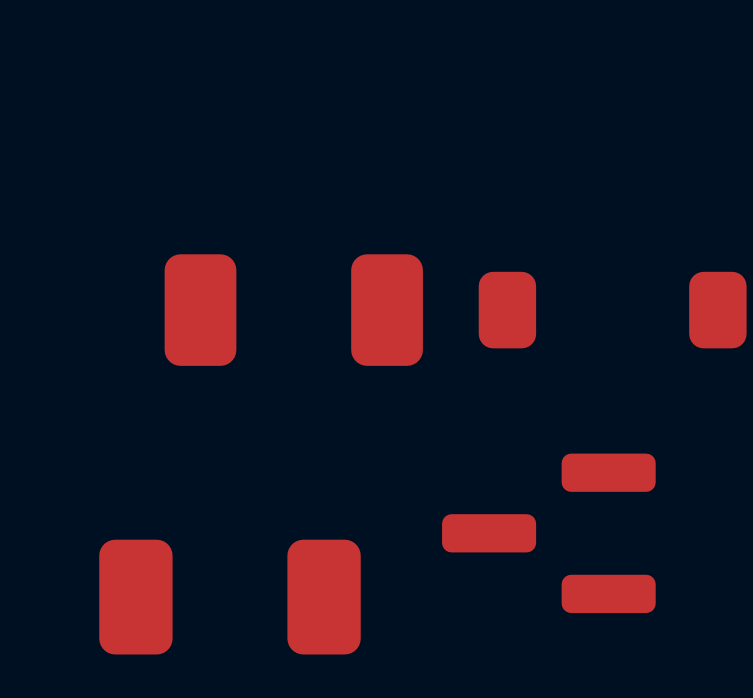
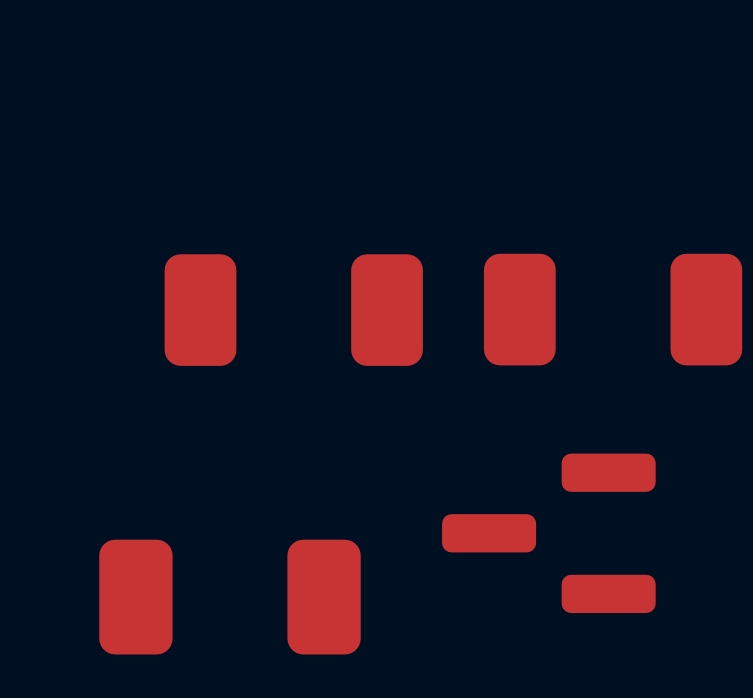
part footprint: [478, 271, 747, 349] -> [483, 253, 743, 366]

